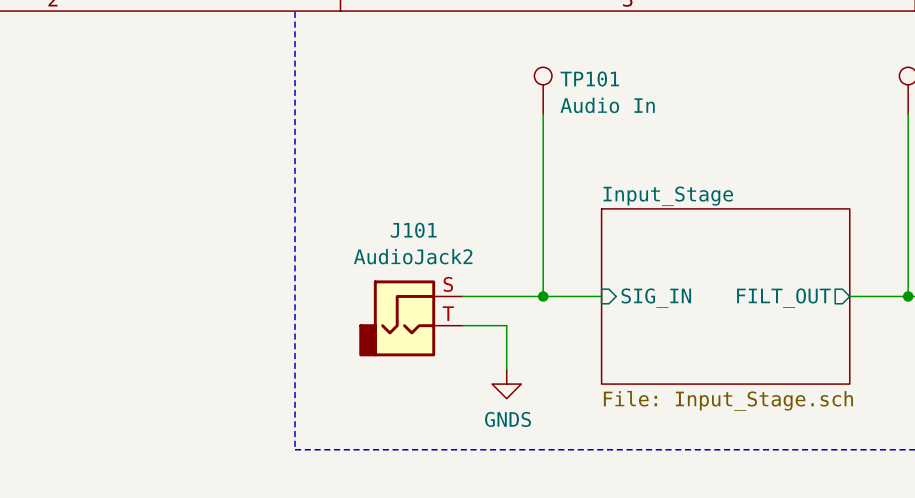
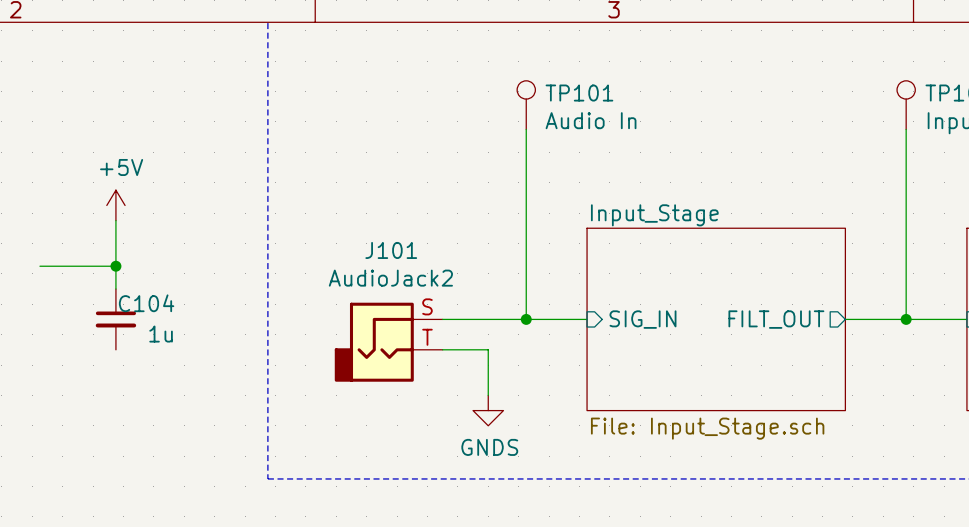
power symbol: none -> +5V (115, 205)
wire: none -> (115, 220) (115, 289)
wire: none -> (39, 266) (115, 266)
junction: none -> (115, 266)
C104: none -> 1u (115, 319)

